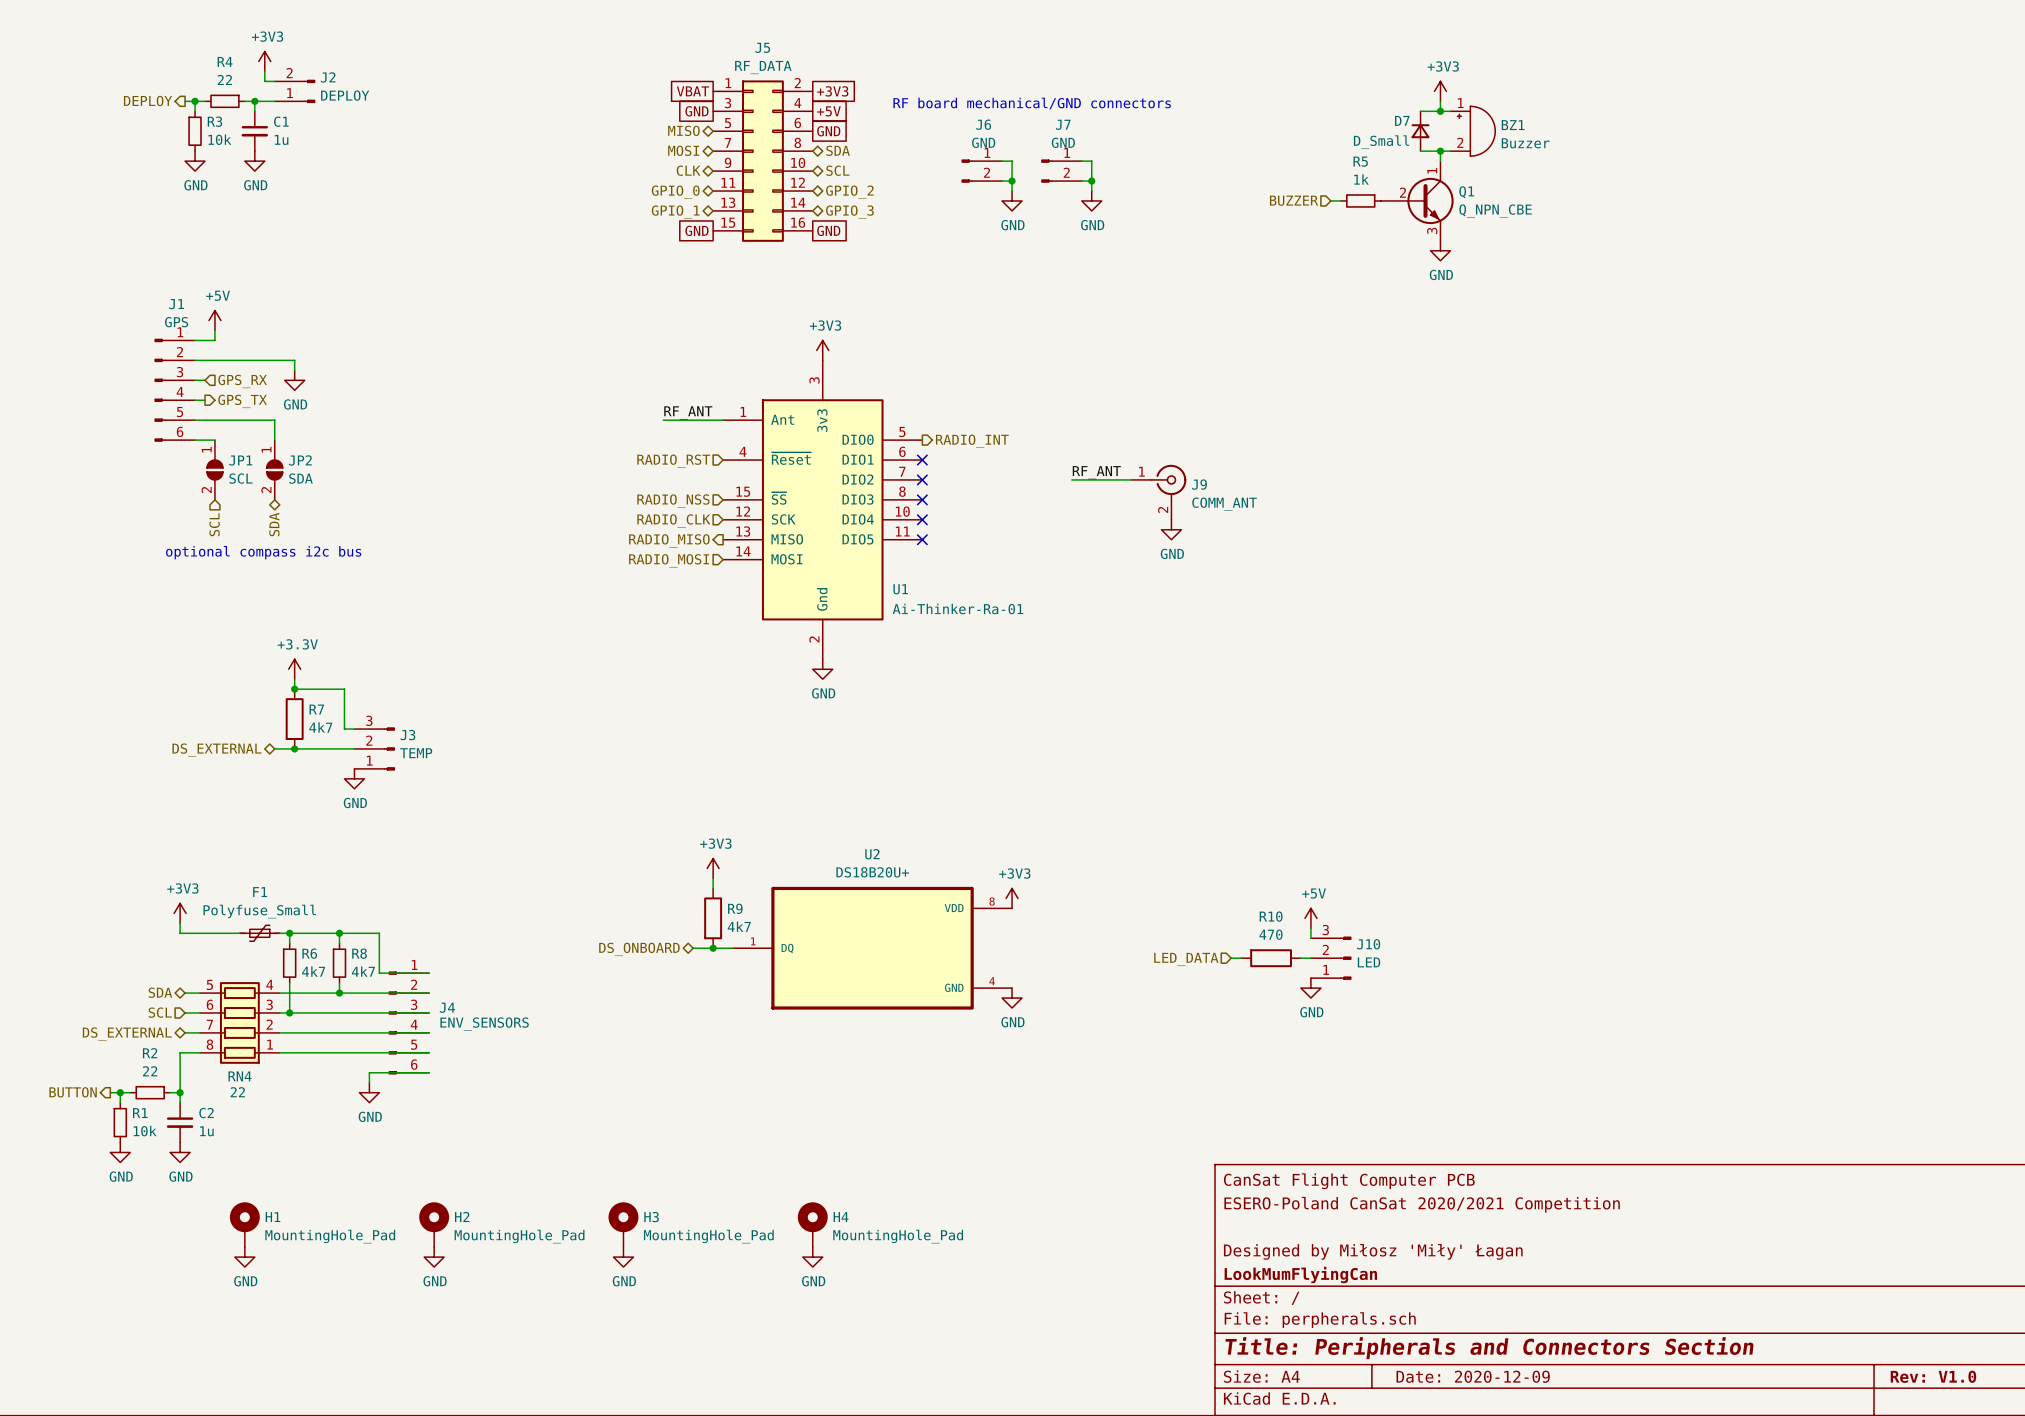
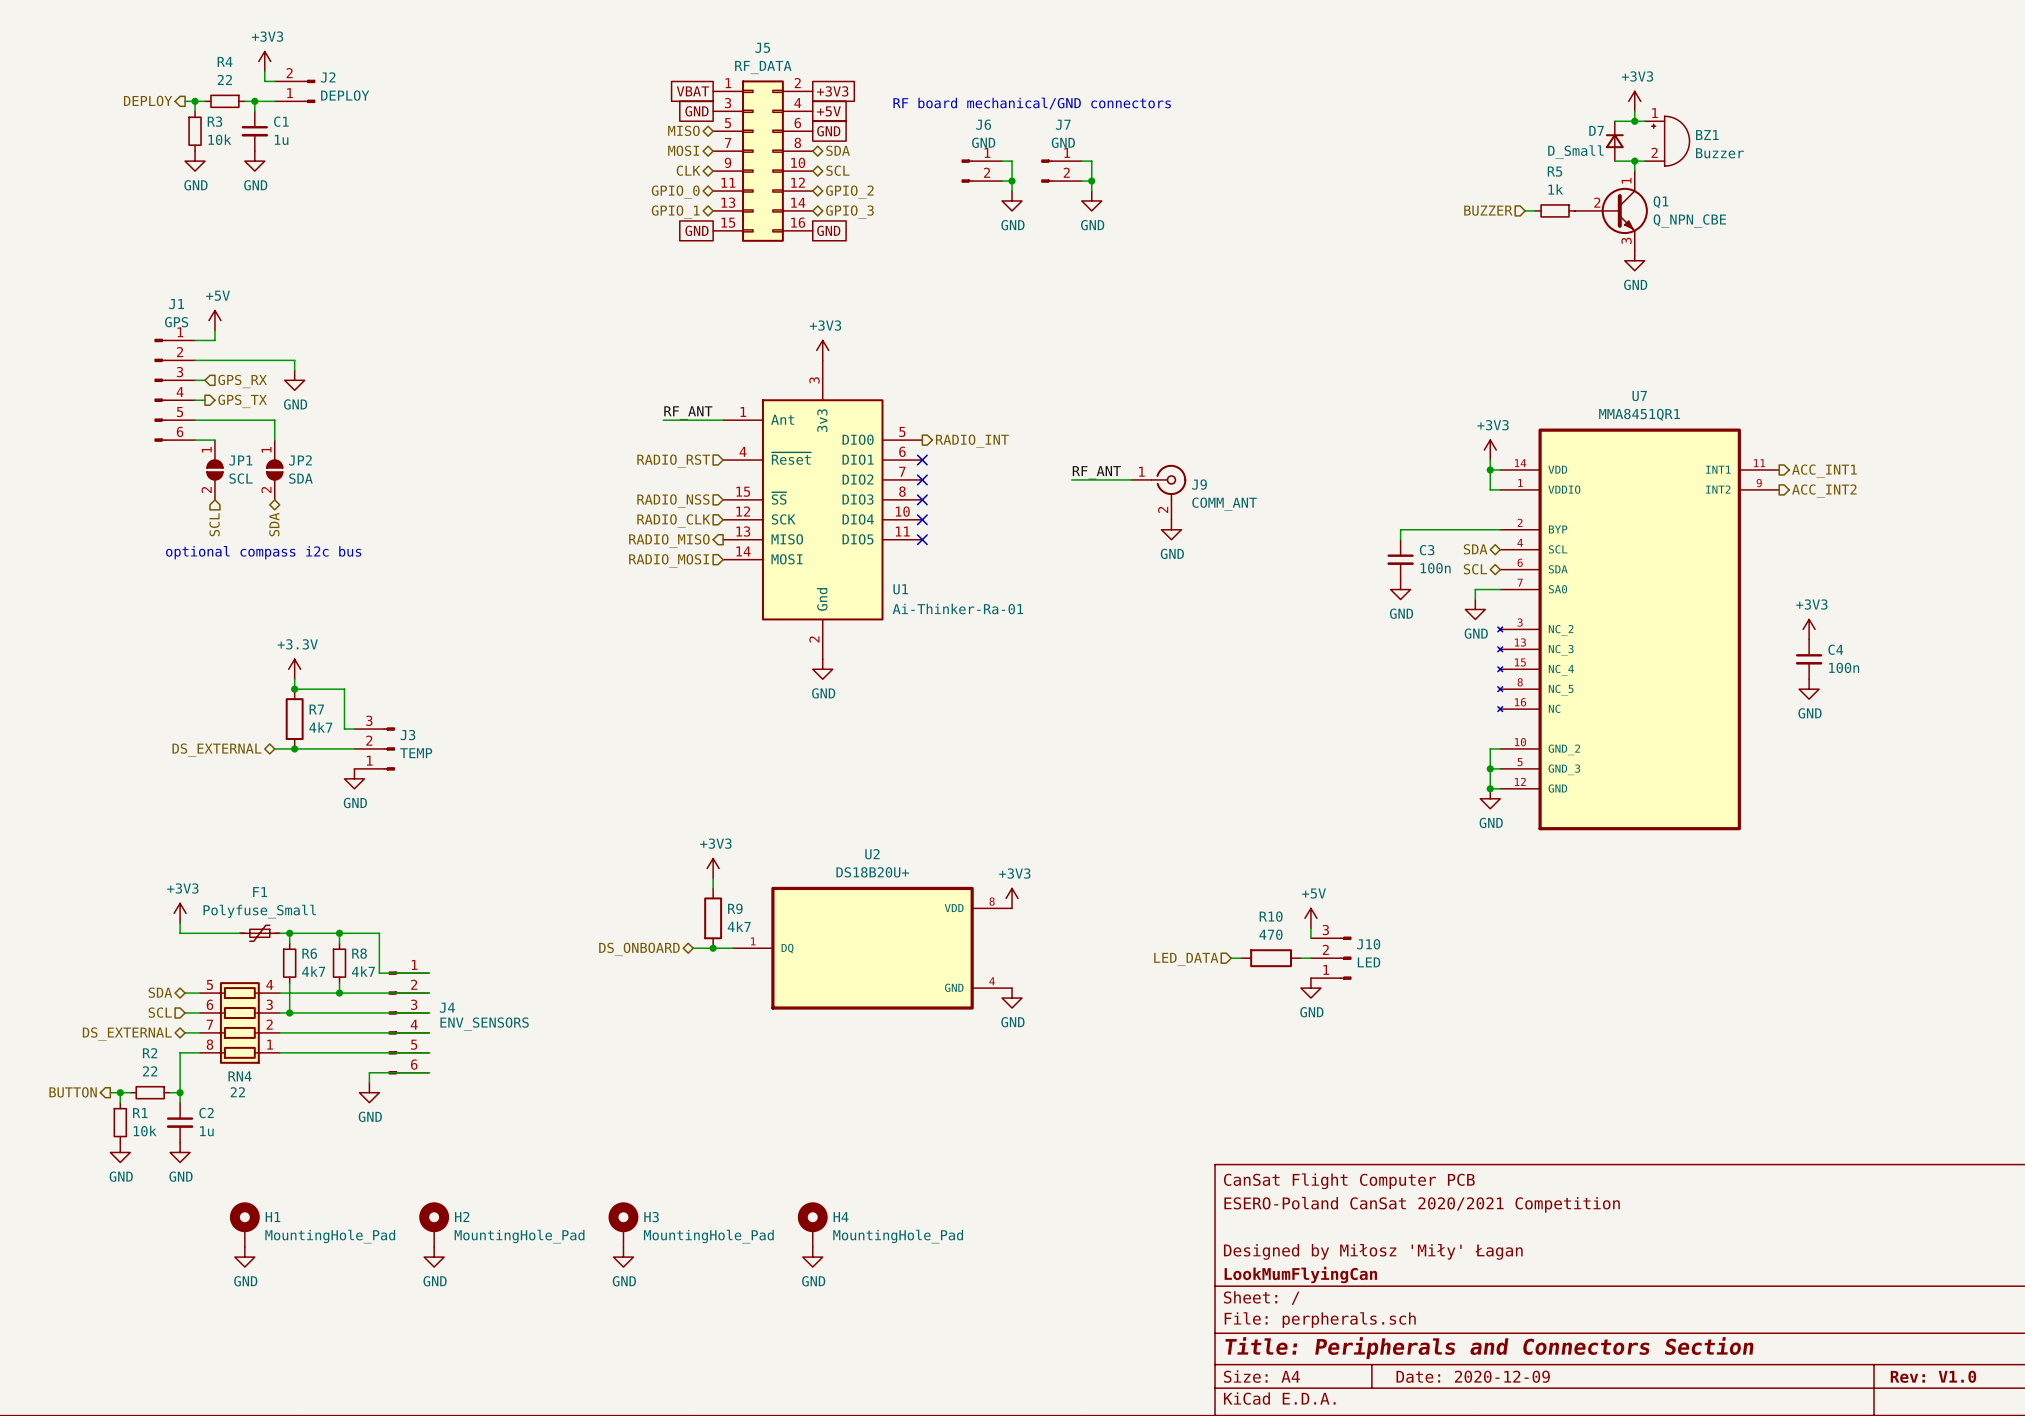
power symbol: +3V3 (1440, 91) -> none
wire: (1440, 101) (1440, 111) -> (1634, 111) (1634, 121)
power symbol: none -> +3V3 (1634, 101)
wire: (1420, 111) (1450, 111) -> (1614, 121) (1644, 121)
junction: (1440, 111) -> none
junction: none -> (1634, 121)
D7 position: (1420, 131) -> (1614, 141)
BZ1 position: (1472, 131) -> (1667, 141)
wire: (1420, 151) (1450, 151) -> (1614, 161) (1644, 161)
wire: (1440, 151) (1440, 161) -> (1634, 161) (1634, 171)
junction: (1440, 151) -> none
junction: none -> (1634, 161)
hierarchical label position: BUZZER (1294, 200) -> BUZZER (1488, 210)
wire: (1330, 200) (1340, 200) -> (1525, 210) (1535, 210)
R5 position: (1360, 200) -> (1555, 210)
Q1 position: (1417, 200) -> (1611, 210)
power symbol: GND (1440, 250) -> none
power symbol: none -> GND (1634, 260)
power symbol: none -> +3V3 (1490, 450)
wire: none -> (1490, 460) (1490, 489) (1500, 489)
wire: none -> (1490, 469) (1500, 469)
junction: none -> (1490, 469)
hierarchical label: none -> ACC_INT1 (1824, 471)
hierarchical label: none -> ACC_INT2 (1824, 491)
wire: none -> (1500, 529) (1400, 529) (1400, 539)
hierarchical label: none -> SDA (1475, 549)
C3: none -> 100n (1400, 559)
hierarchical label: none -> SCL (1475, 569)
power symbol: none -> GND (1400, 589)
wire: none -> (1500, 589) (1475, 589) (1475, 599)
power symbol: none -> GND (1475, 609)
U7: none -> MMA8451QR1 (1638, 629)
power symbol: none -> +3V3 (1809, 629)
C4: none -> 100n (1809, 659)
power symbol: none -> GND (1809, 689)
wire: none -> (1500, 748) (1490, 748) (1490, 788) (1500, 788)
wire: none -> (1490, 768) (1500, 768)
junction: none -> (1490, 768)
junction: none -> (1490, 788)
power symbol: none -> GND (1490, 798)

